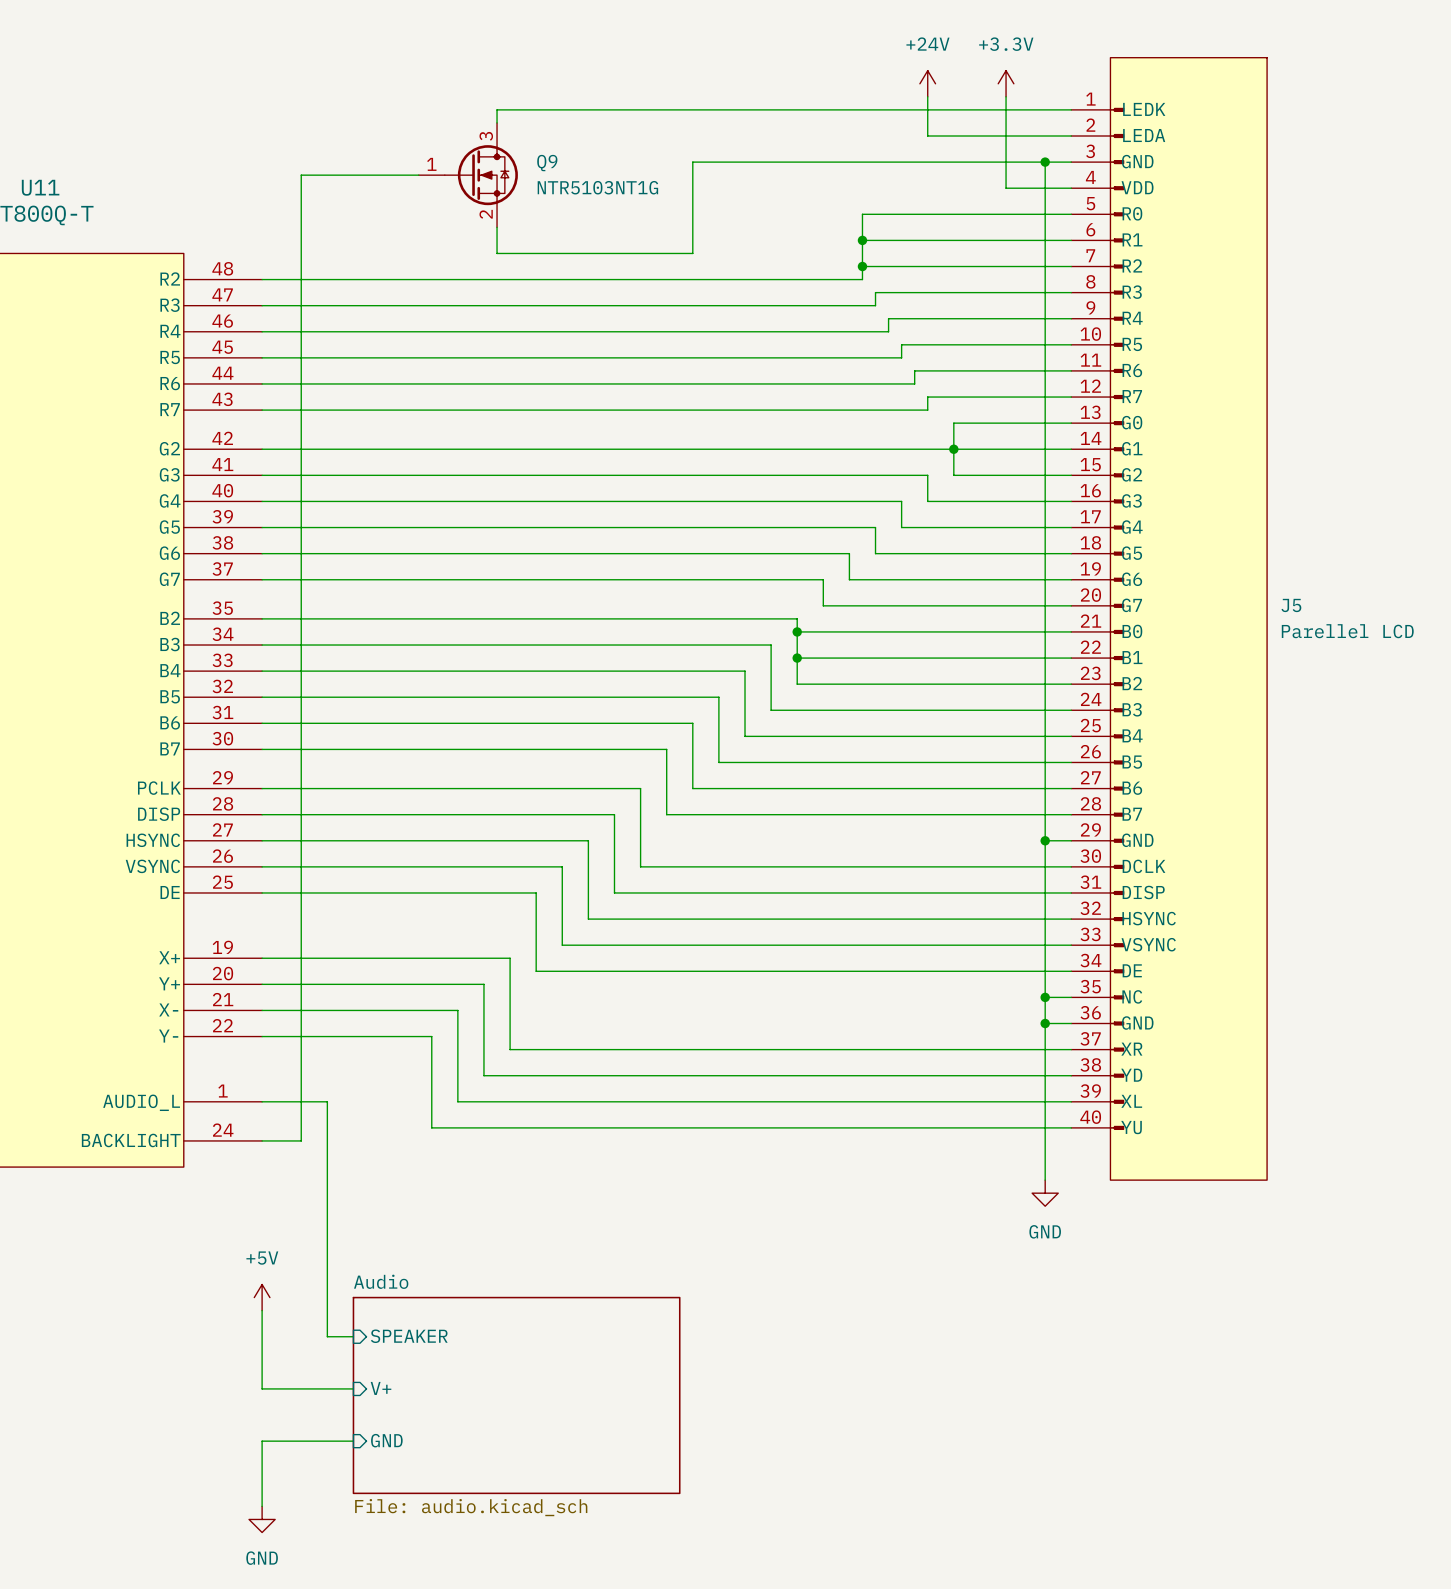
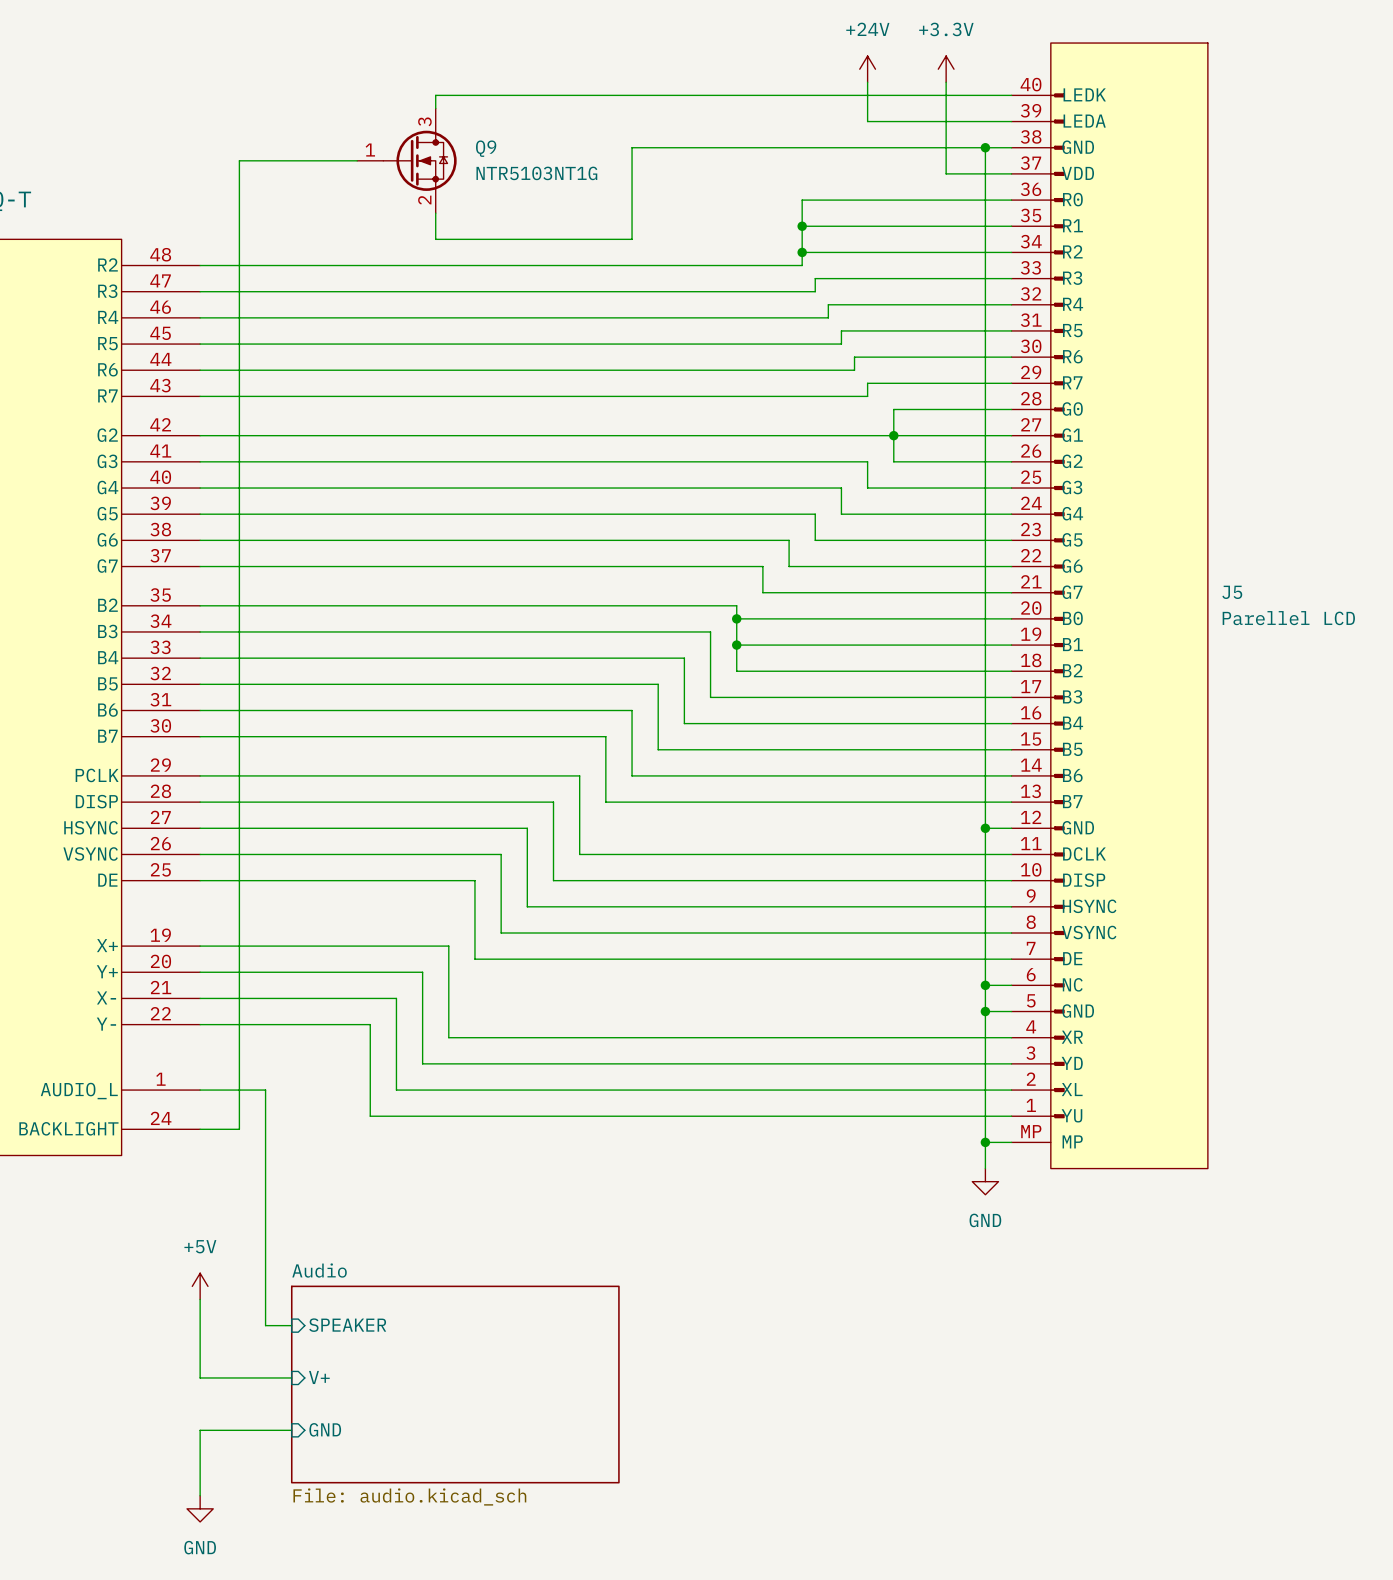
J5 symbol: [1071, 57, 1268, 1181] -> [1011, 43, 1208, 1169]
wire: none -> (985, 1142) (1011, 1142)
junction: none -> (985, 1142)

